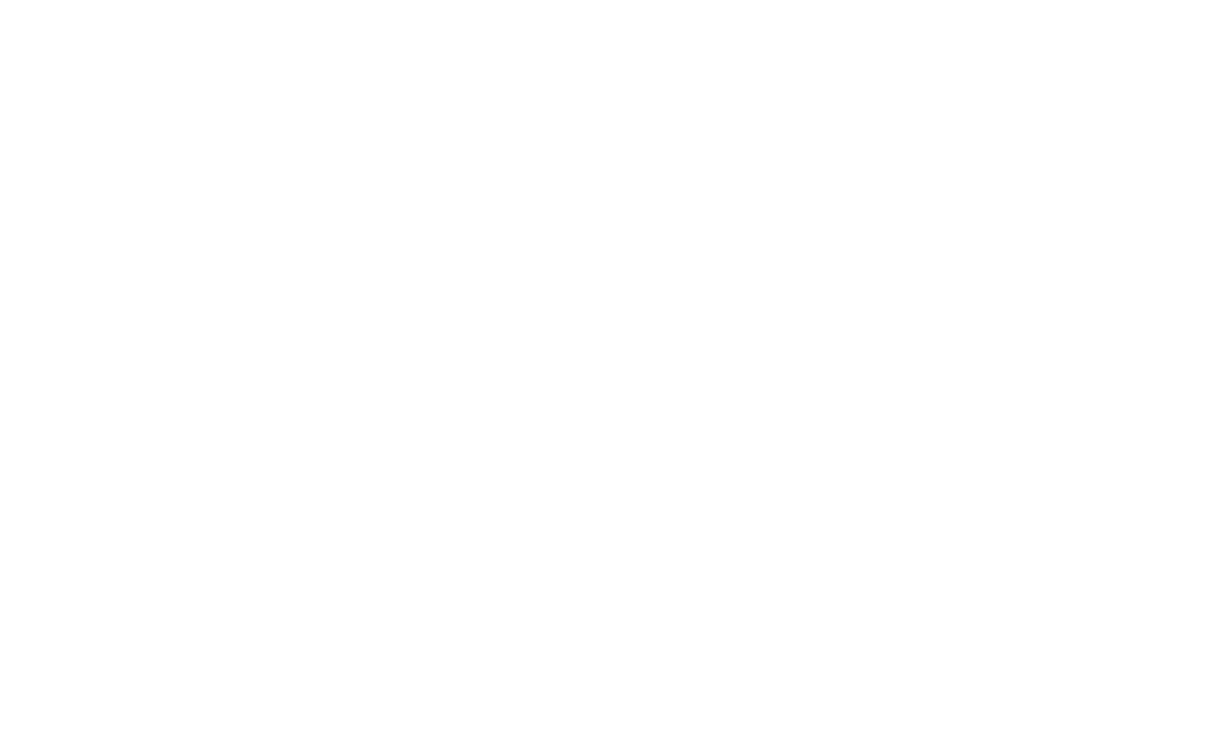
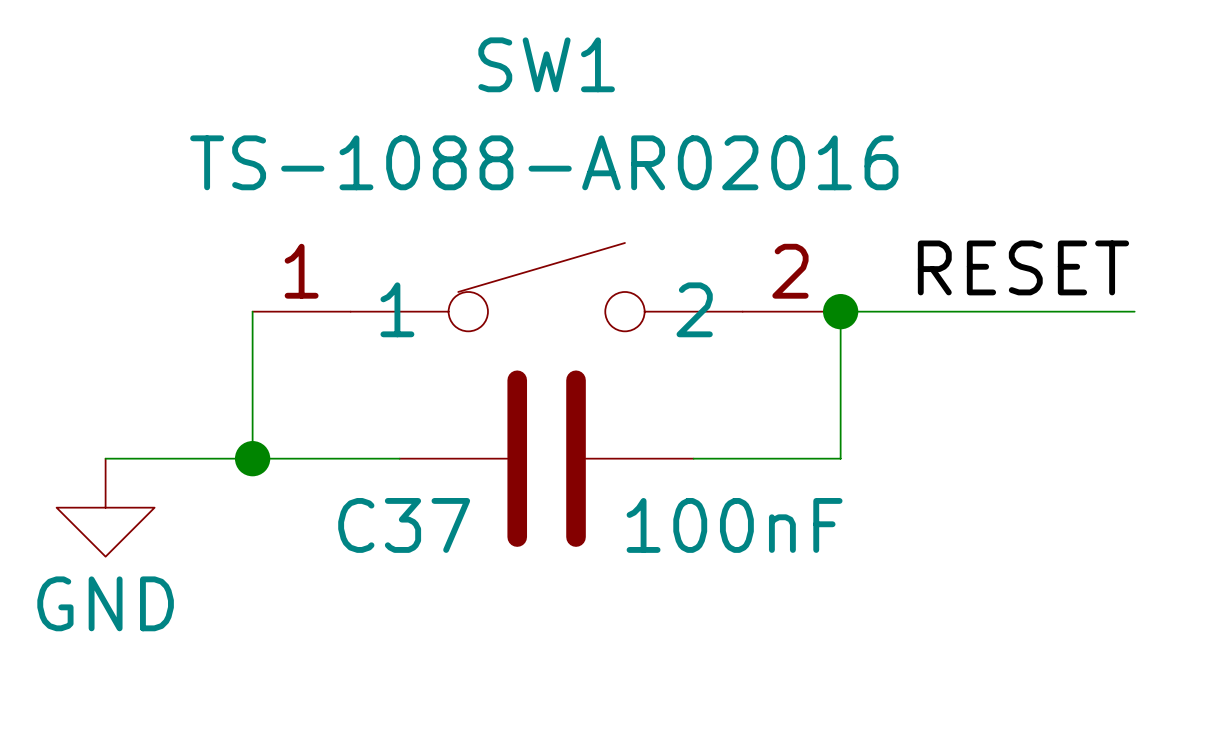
label: none -> RESET (1023, 267)
SW1: none -> TS-1088-AR02016 (546, 287)
wire: none -> (252, 311) (252, 458)
junction: none -> (840, 311)
wire: none -> (1134, 311) (840, 311) (840, 458) (693, 458)
wire: none -> (105, 458) (399, 458)
junction: none -> (252, 458)
C37: none -> 100nF (546, 458)
power symbol: none -> GND (105, 507)

